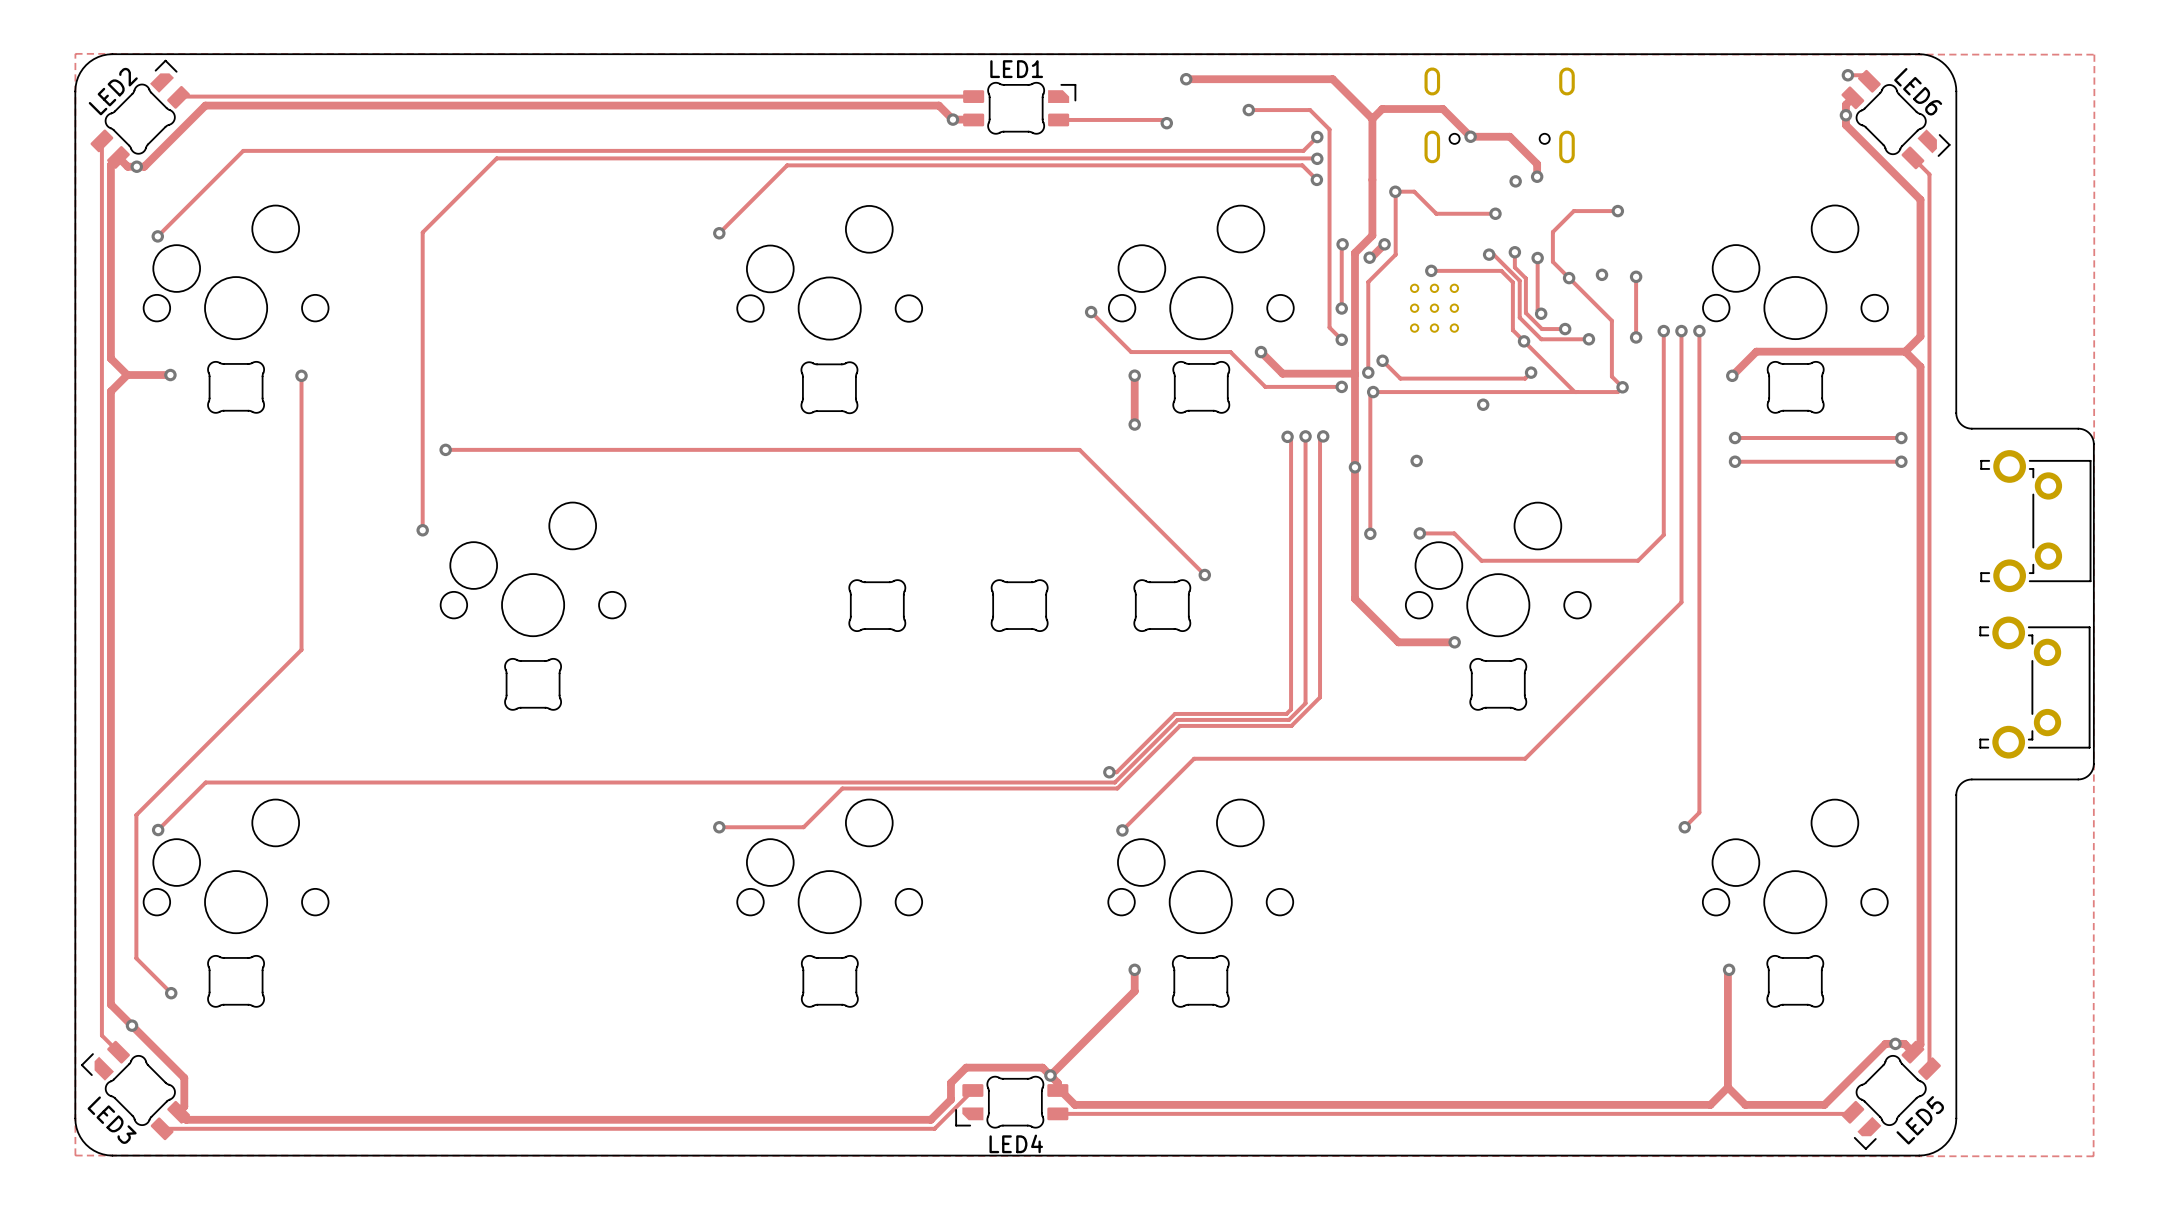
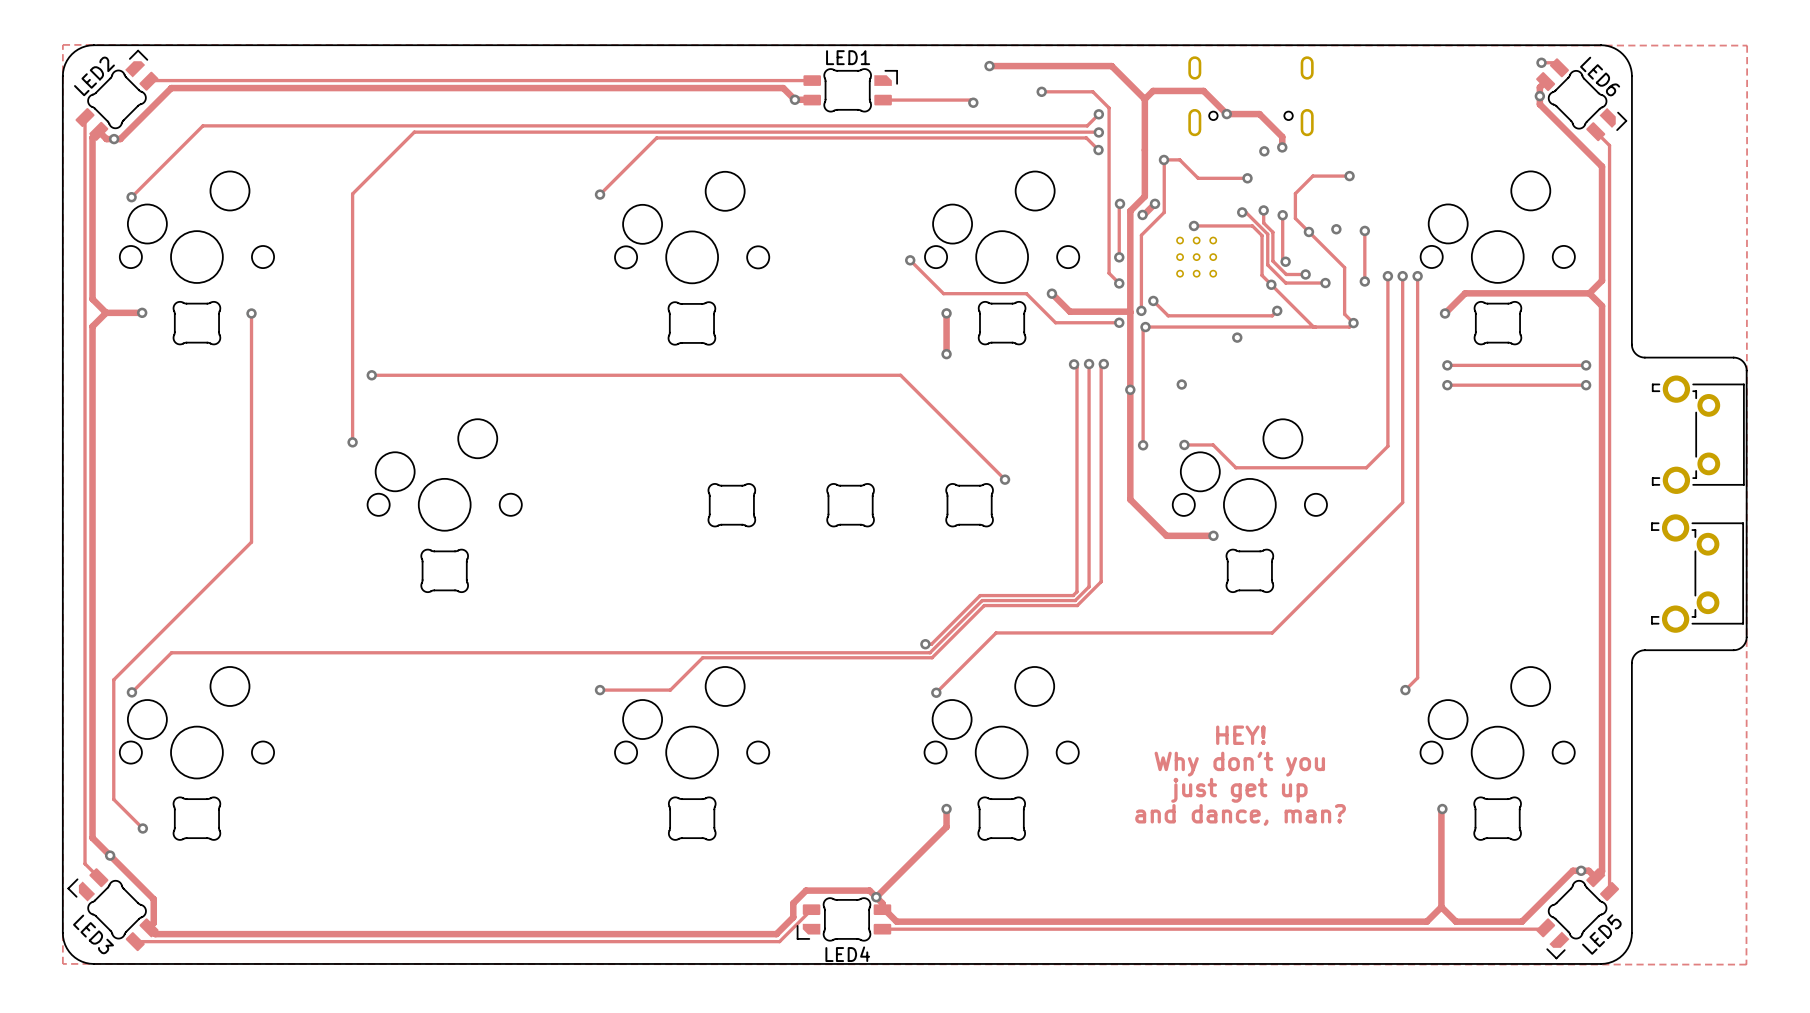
text: none -> HEY! (1240, 735)
text: none -> Why don't you (1239, 764)
text: none -> just get up (1239, 790)
text: none -> and dance, man? (1240, 814)

